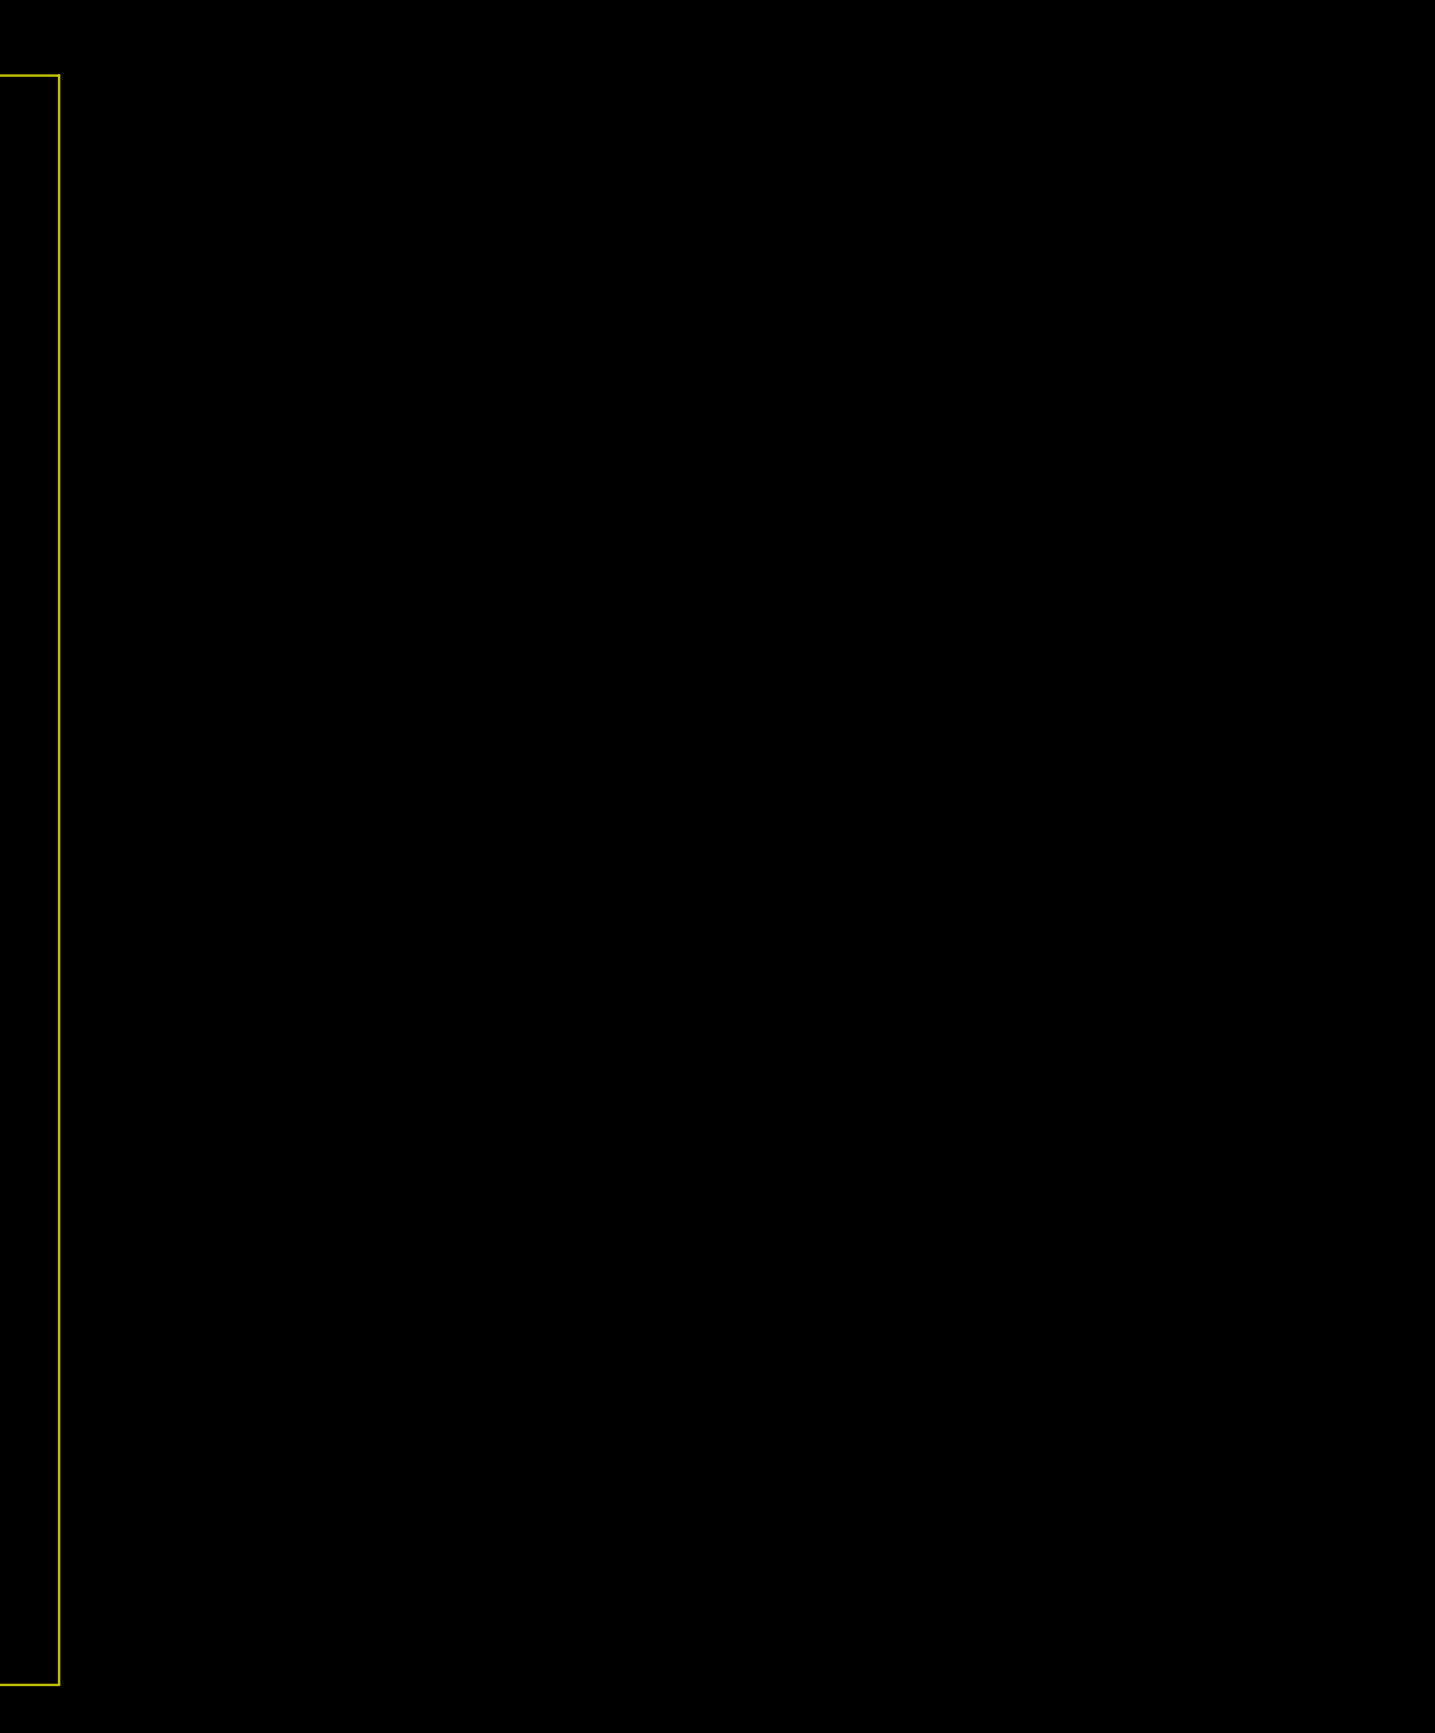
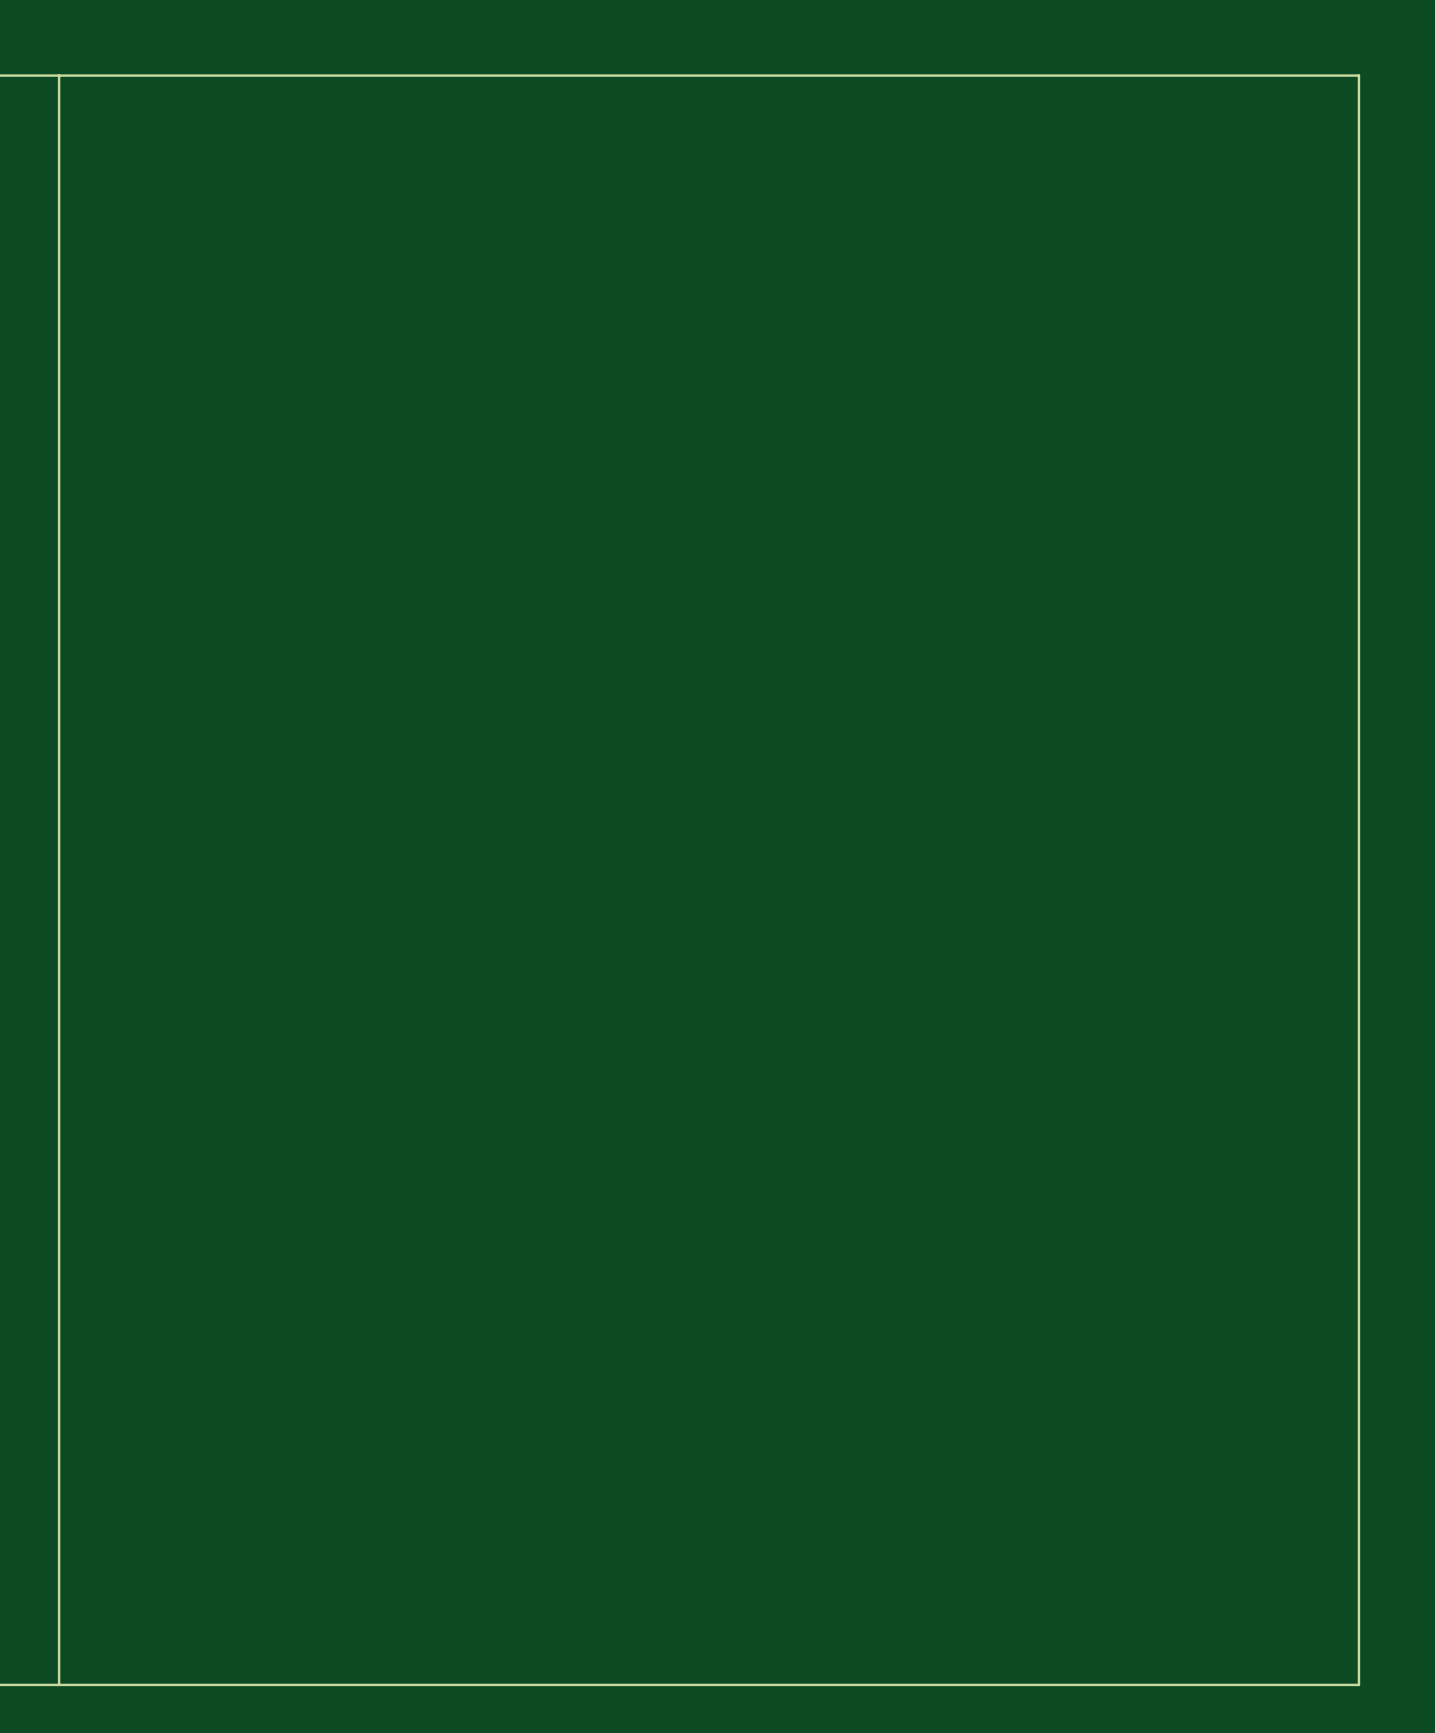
board edge: none -> (59, 75) (1358, 75) (1358, 1684) (59, 1684)

